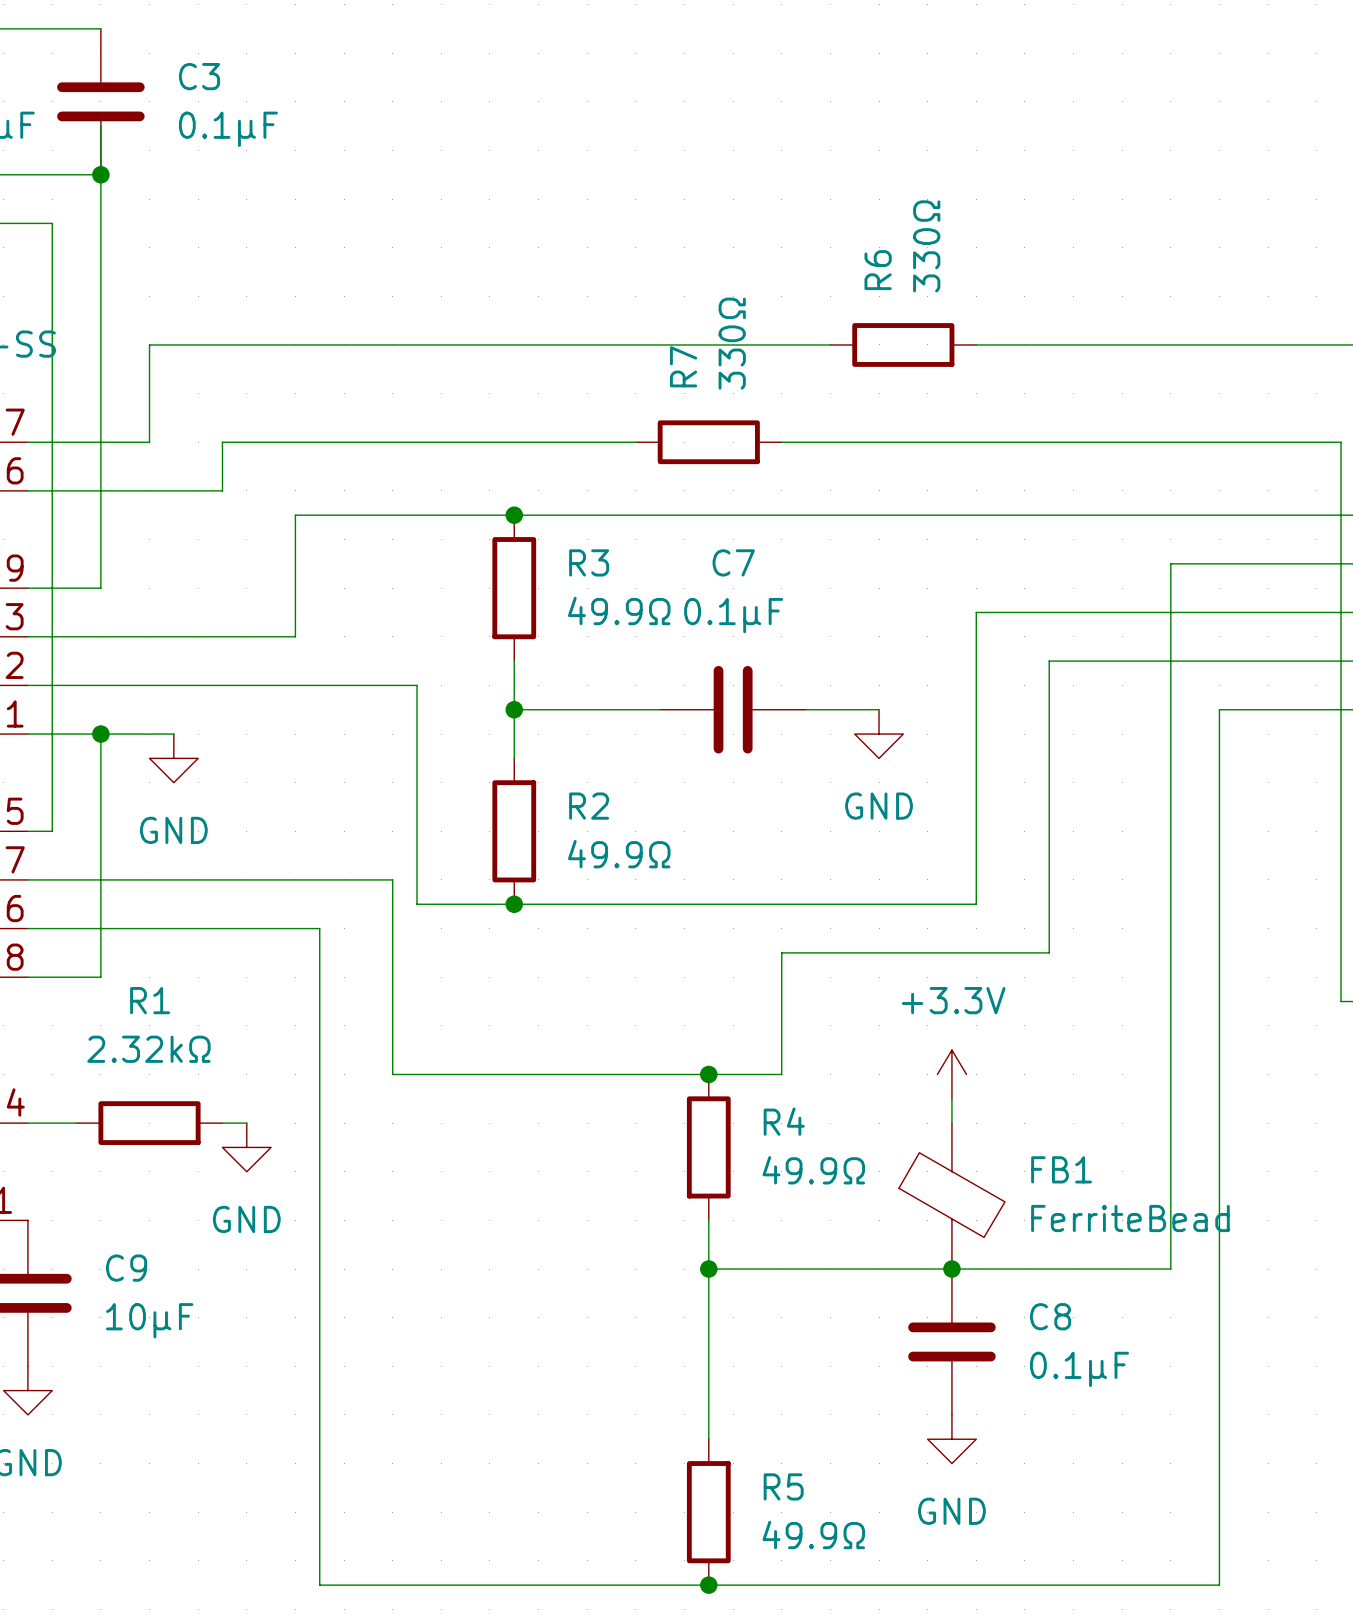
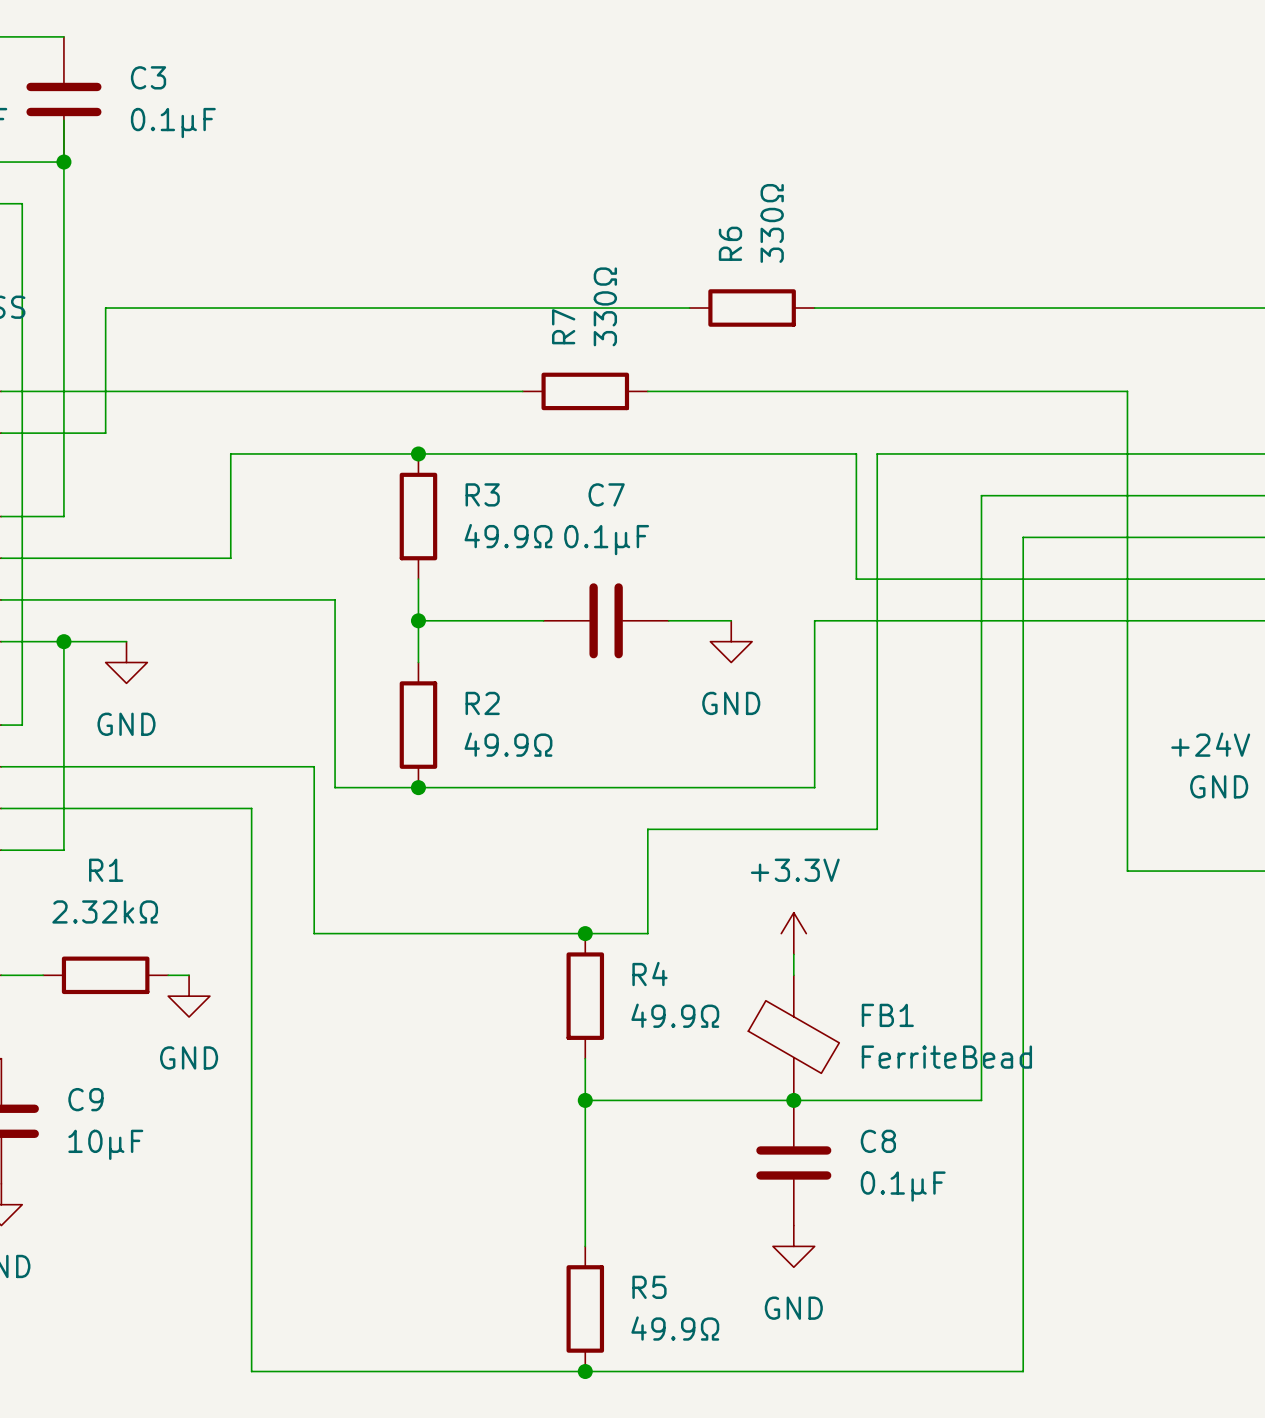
wire: (222, 442) (222, 490) (149, 490) -> (168, 391) (105, 391) (105, 433)
wire: (1024, 515) (1049, 515) -> (856, 453) (856, 579) (877, 579) (877, 453)
wire: (1219, 612) (976, 612) (976, 709) -> (1023, 537) (1023, 620) (814, 620)

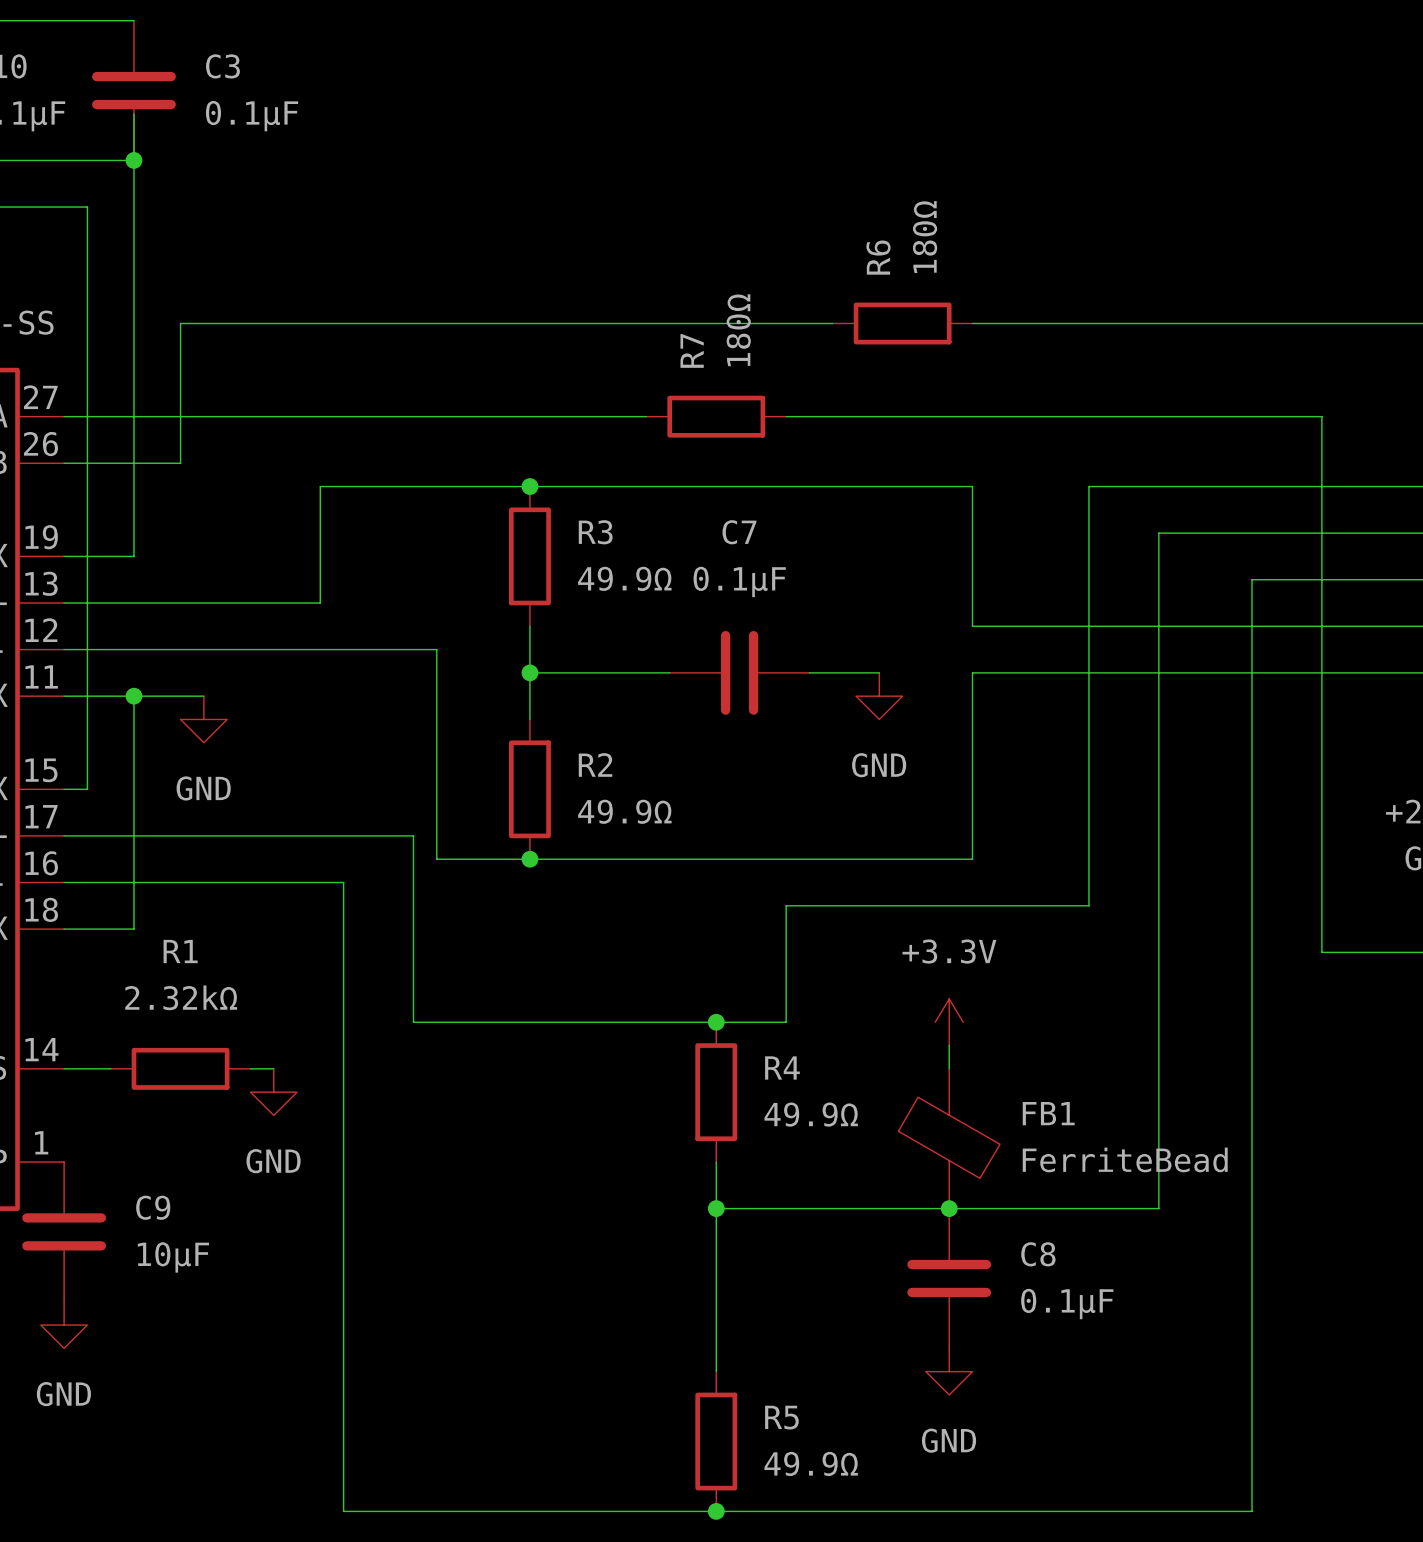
R6 value: 330Ω (772, 223) -> 180Ω (925, 237)
R7 value: 330Ω (605, 306) -> 180Ω (738, 330)
wire: (814, 453) (856, 453) (856, 579) -> (972, 486) (972, 626) (1019, 626)
wire: (918, 453) (877, 453) (877, 829) -> (1088, 486) (1088, 905) (1042, 905)
wire: (1064, 537) (1023, 537) (1023, 1371) -> (1252, 579) (1252, 1511) (1205, 1511)

